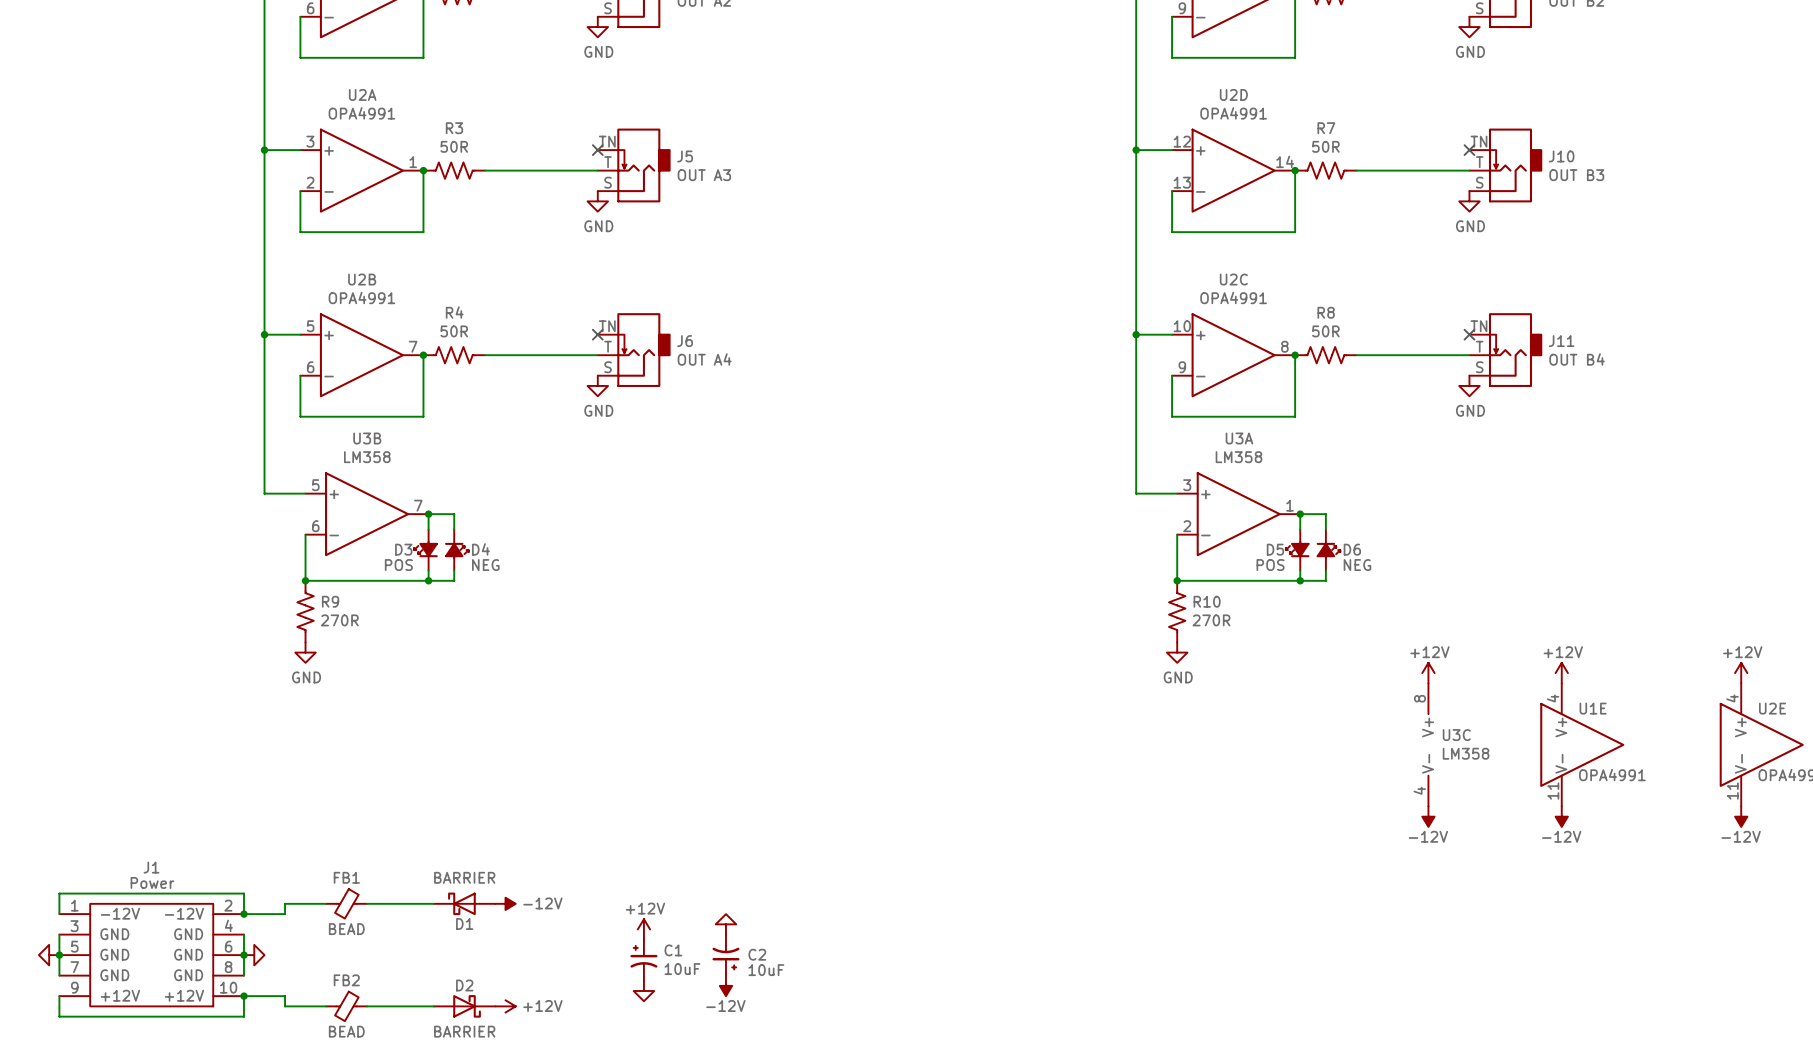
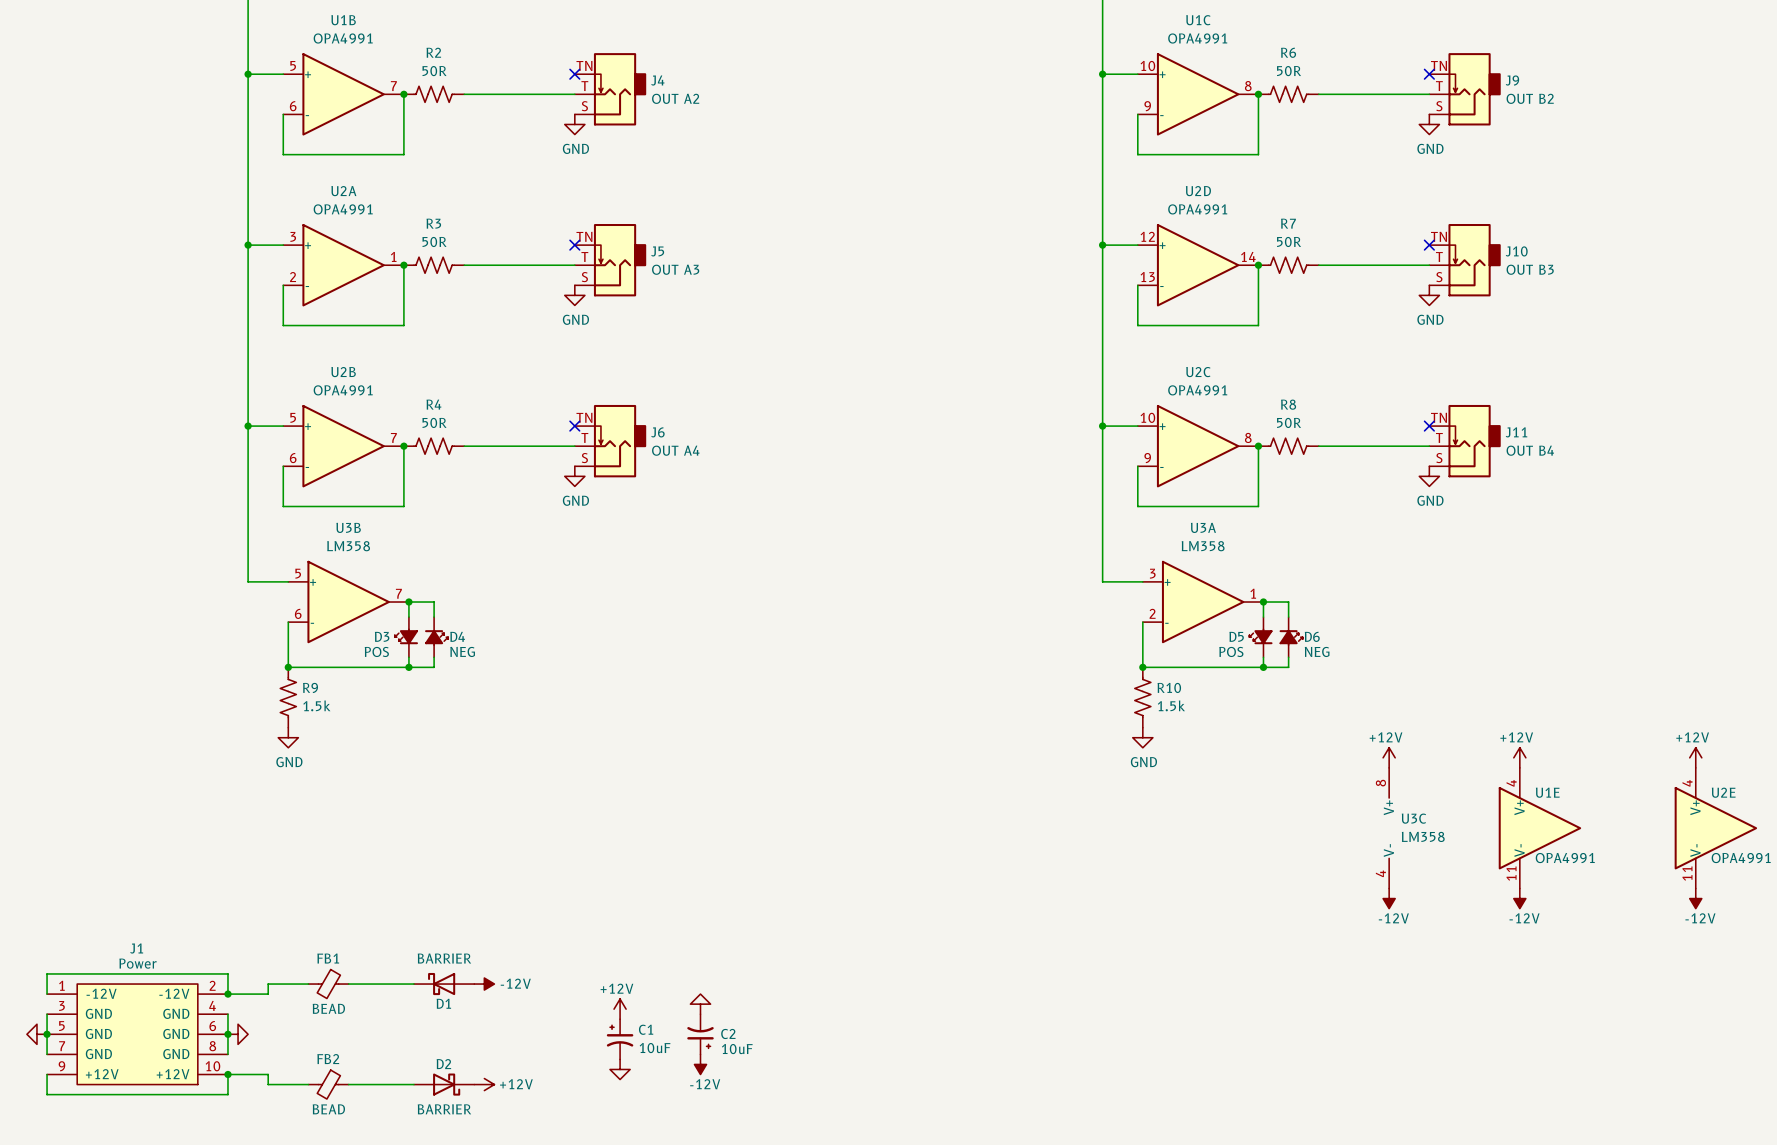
R9 value: 270R (339, 620) -> 1.5k (316, 705)
R10 value: 270R (1211, 620) -> 1.5k (1171, 705)

